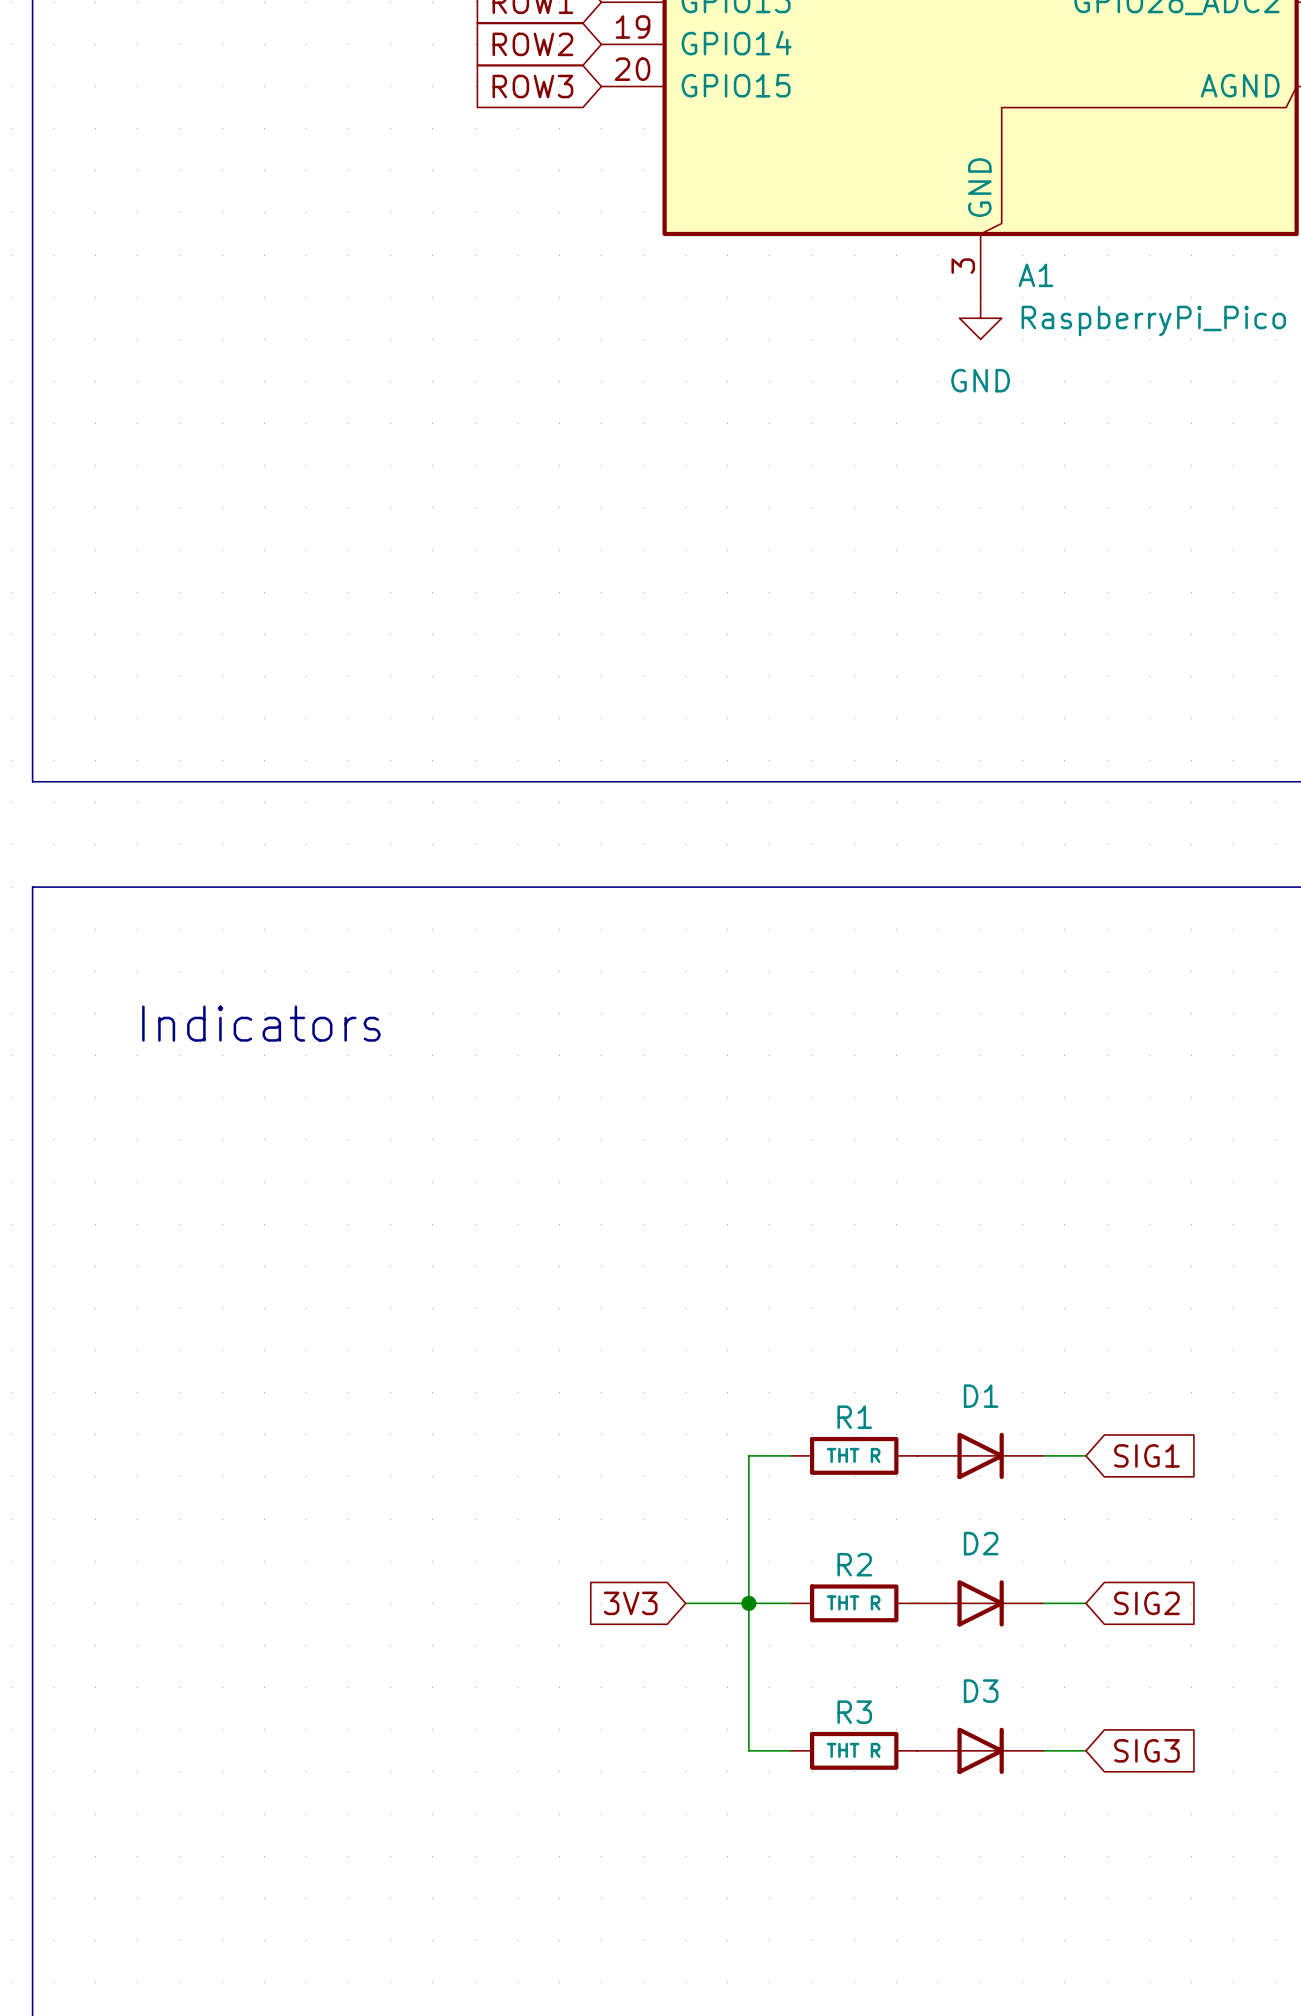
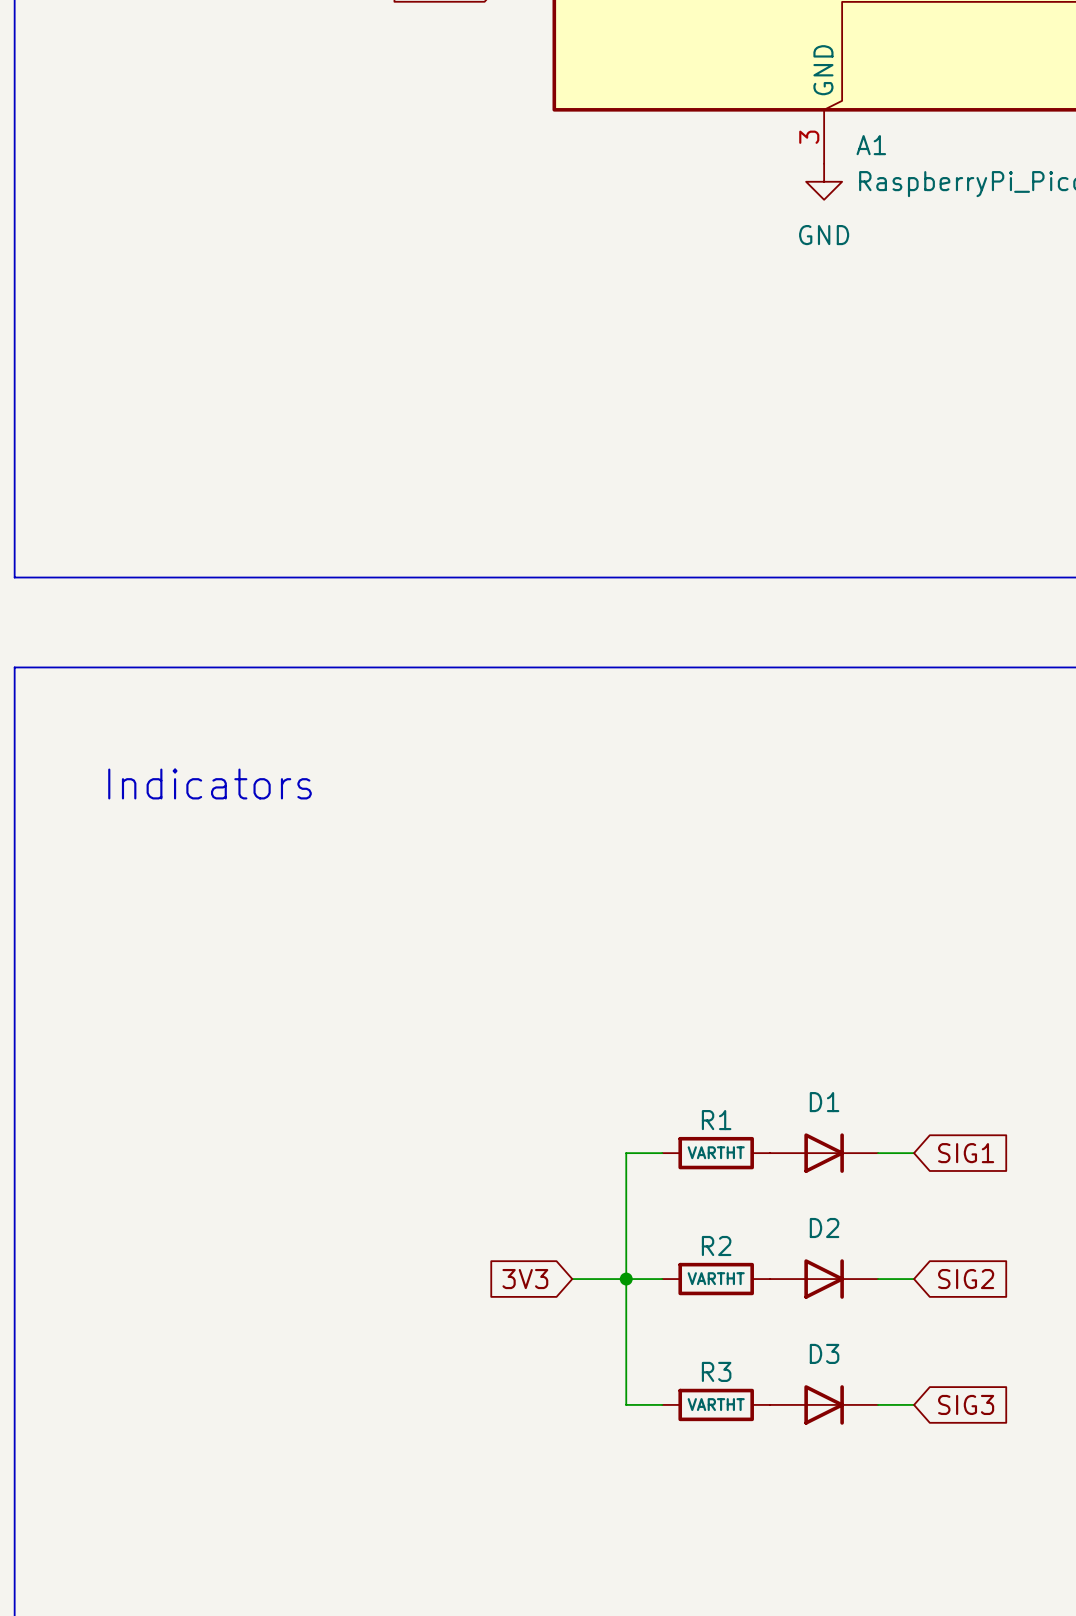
R1 value: THT R (853, 1455) -> VARTHT (716, 1152)
R2 value: THT R (853, 1602) -> VARTHT (716, 1278)
R3 value: THT R (853, 1750) -> VARTHT (716, 1404)

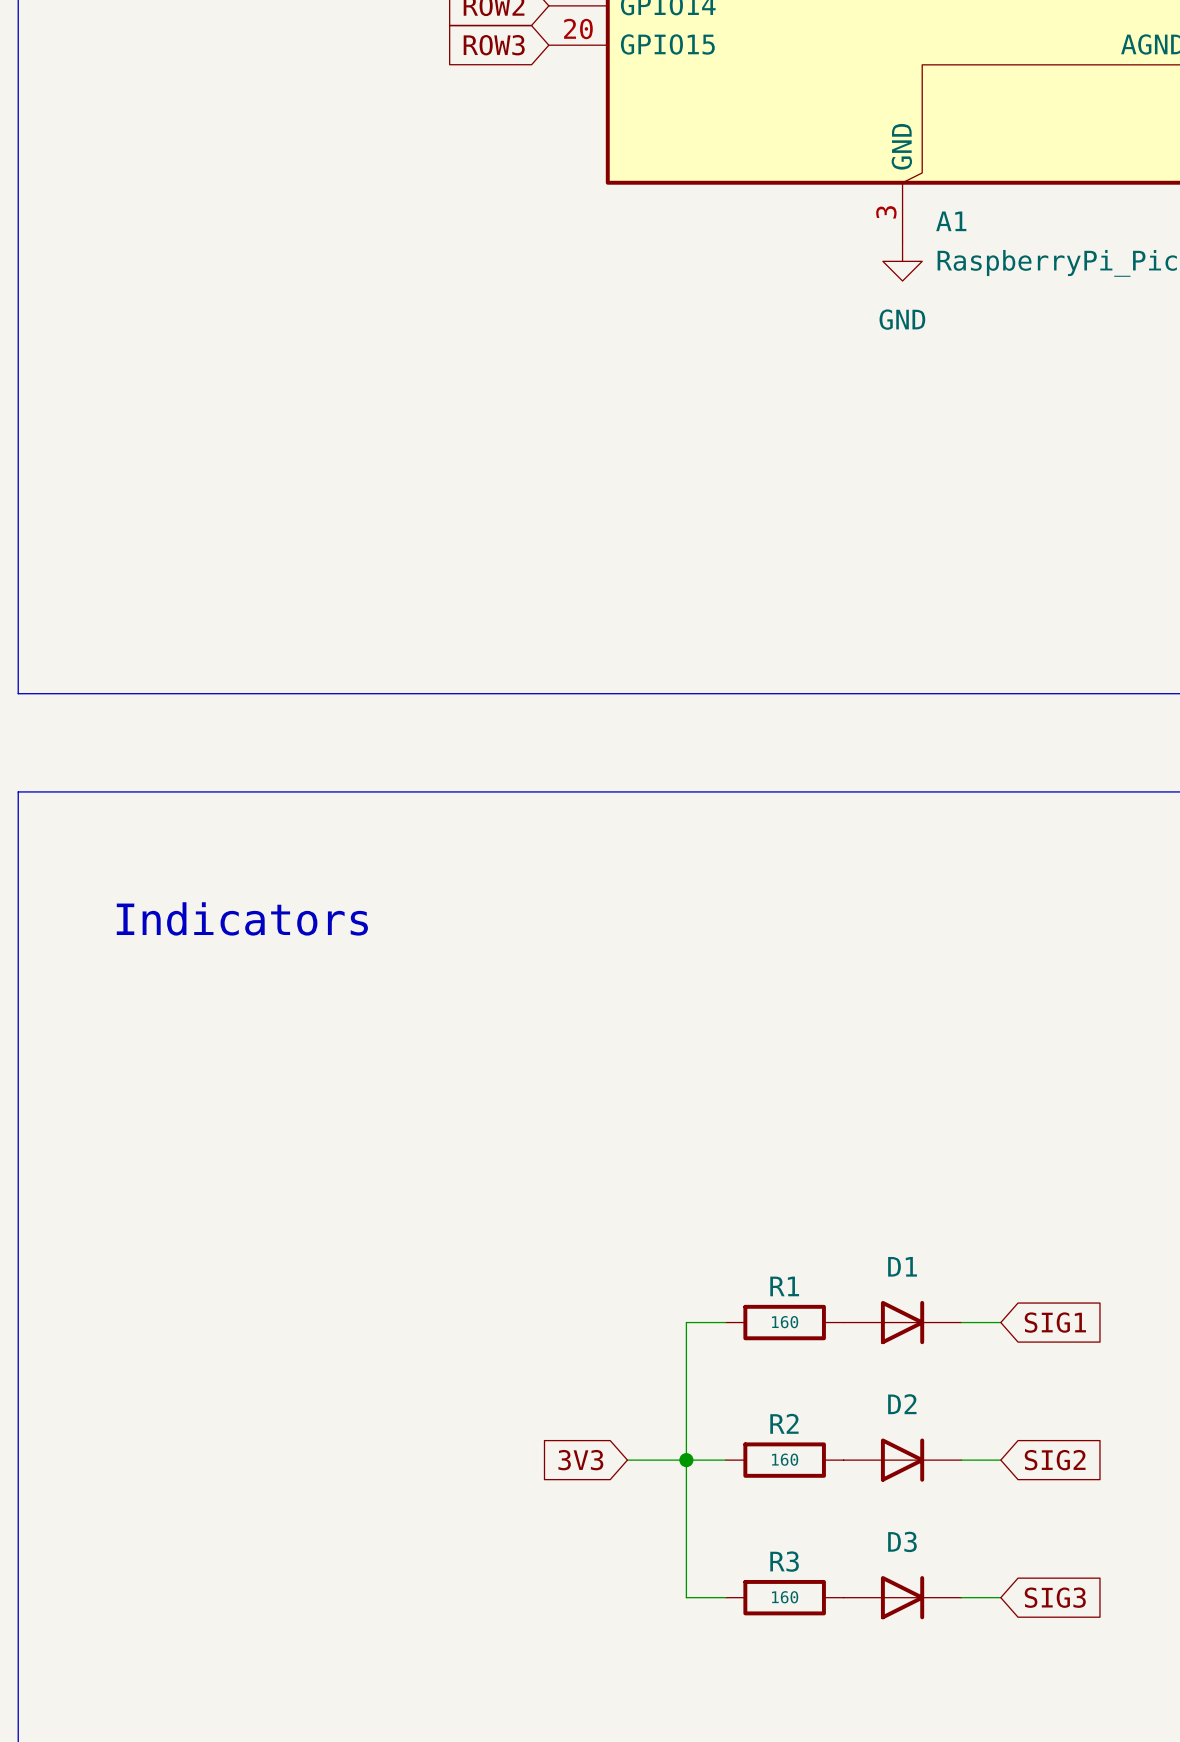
R1 value: VARTHT (716, 1152) -> 160 (785, 1322)
R2 value: VARTHT (716, 1278) -> 160 (785, 1459)
R3 value: VARTHT (716, 1404) -> 160 (785, 1597)

